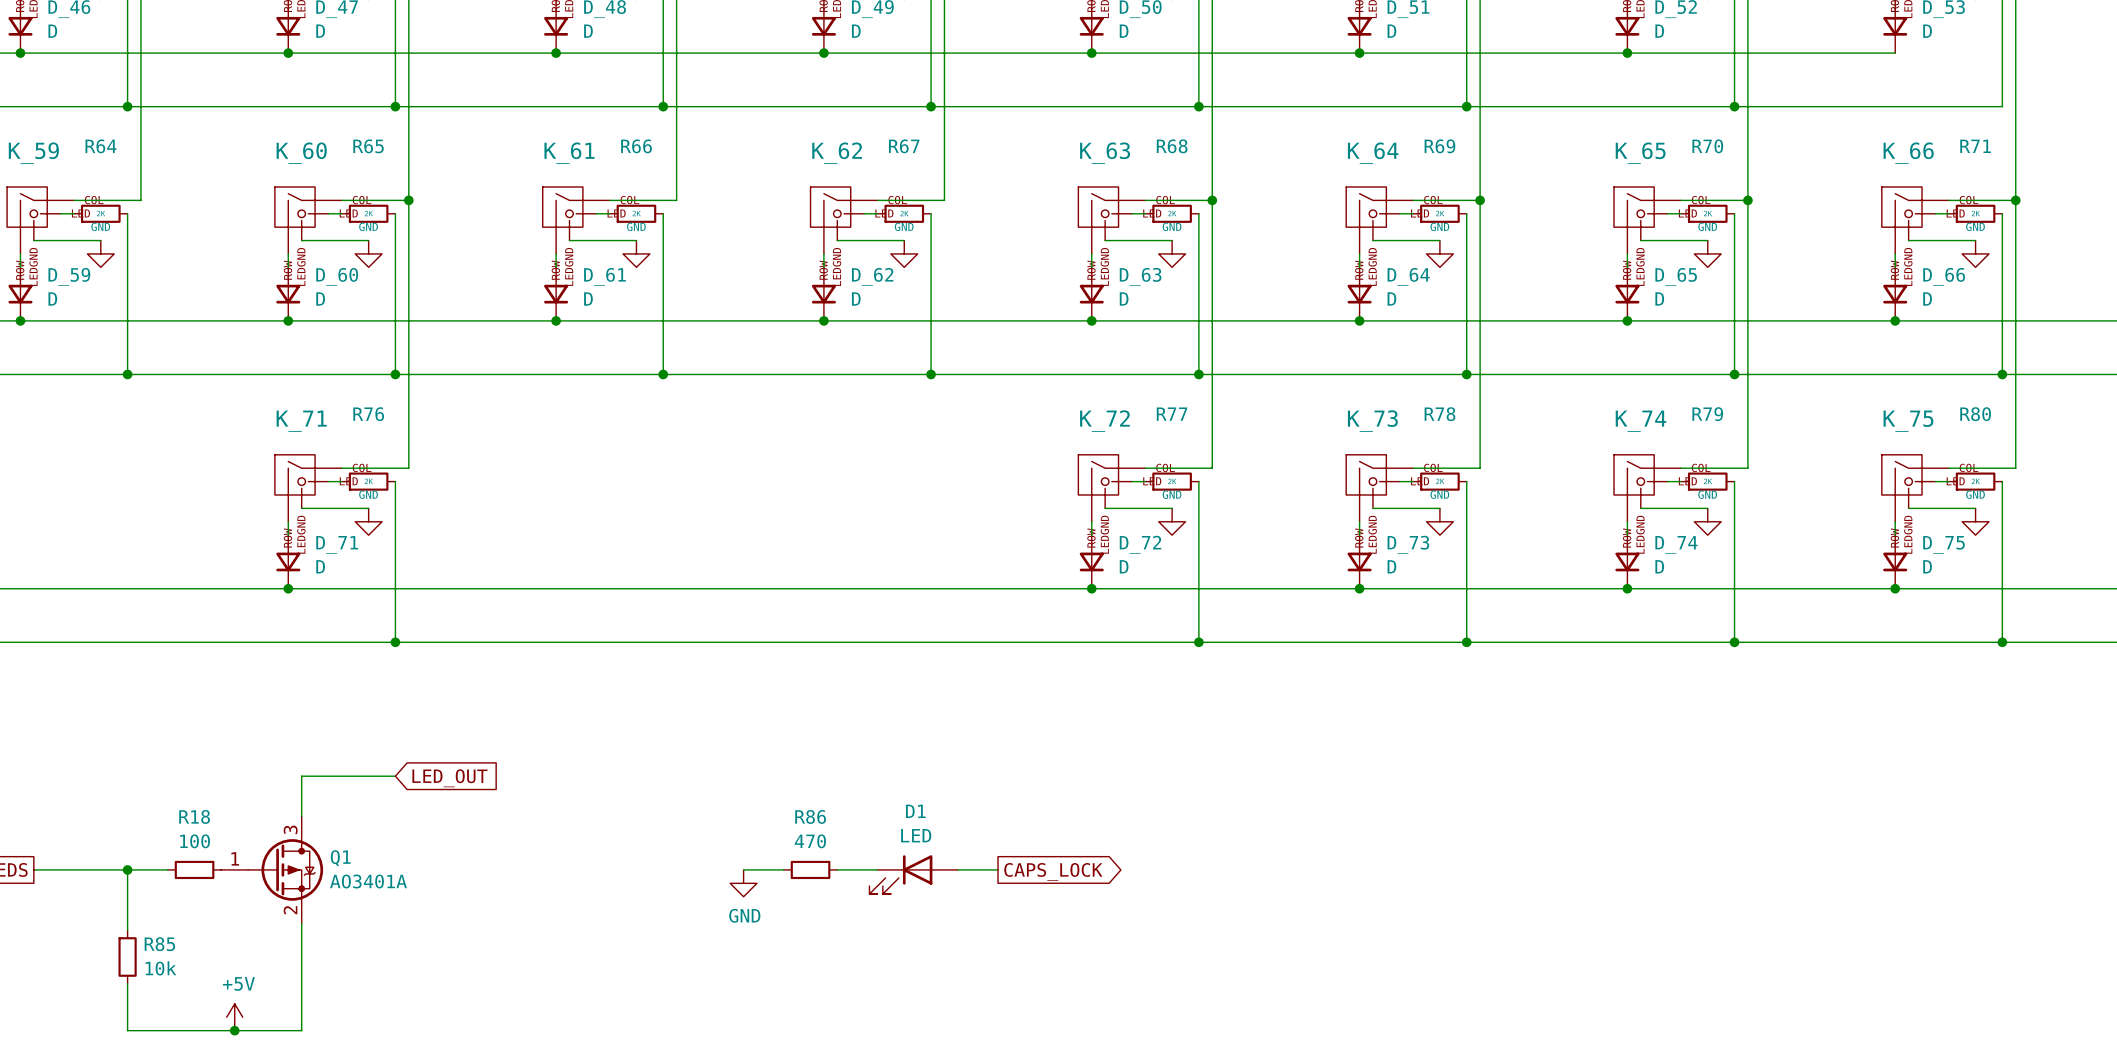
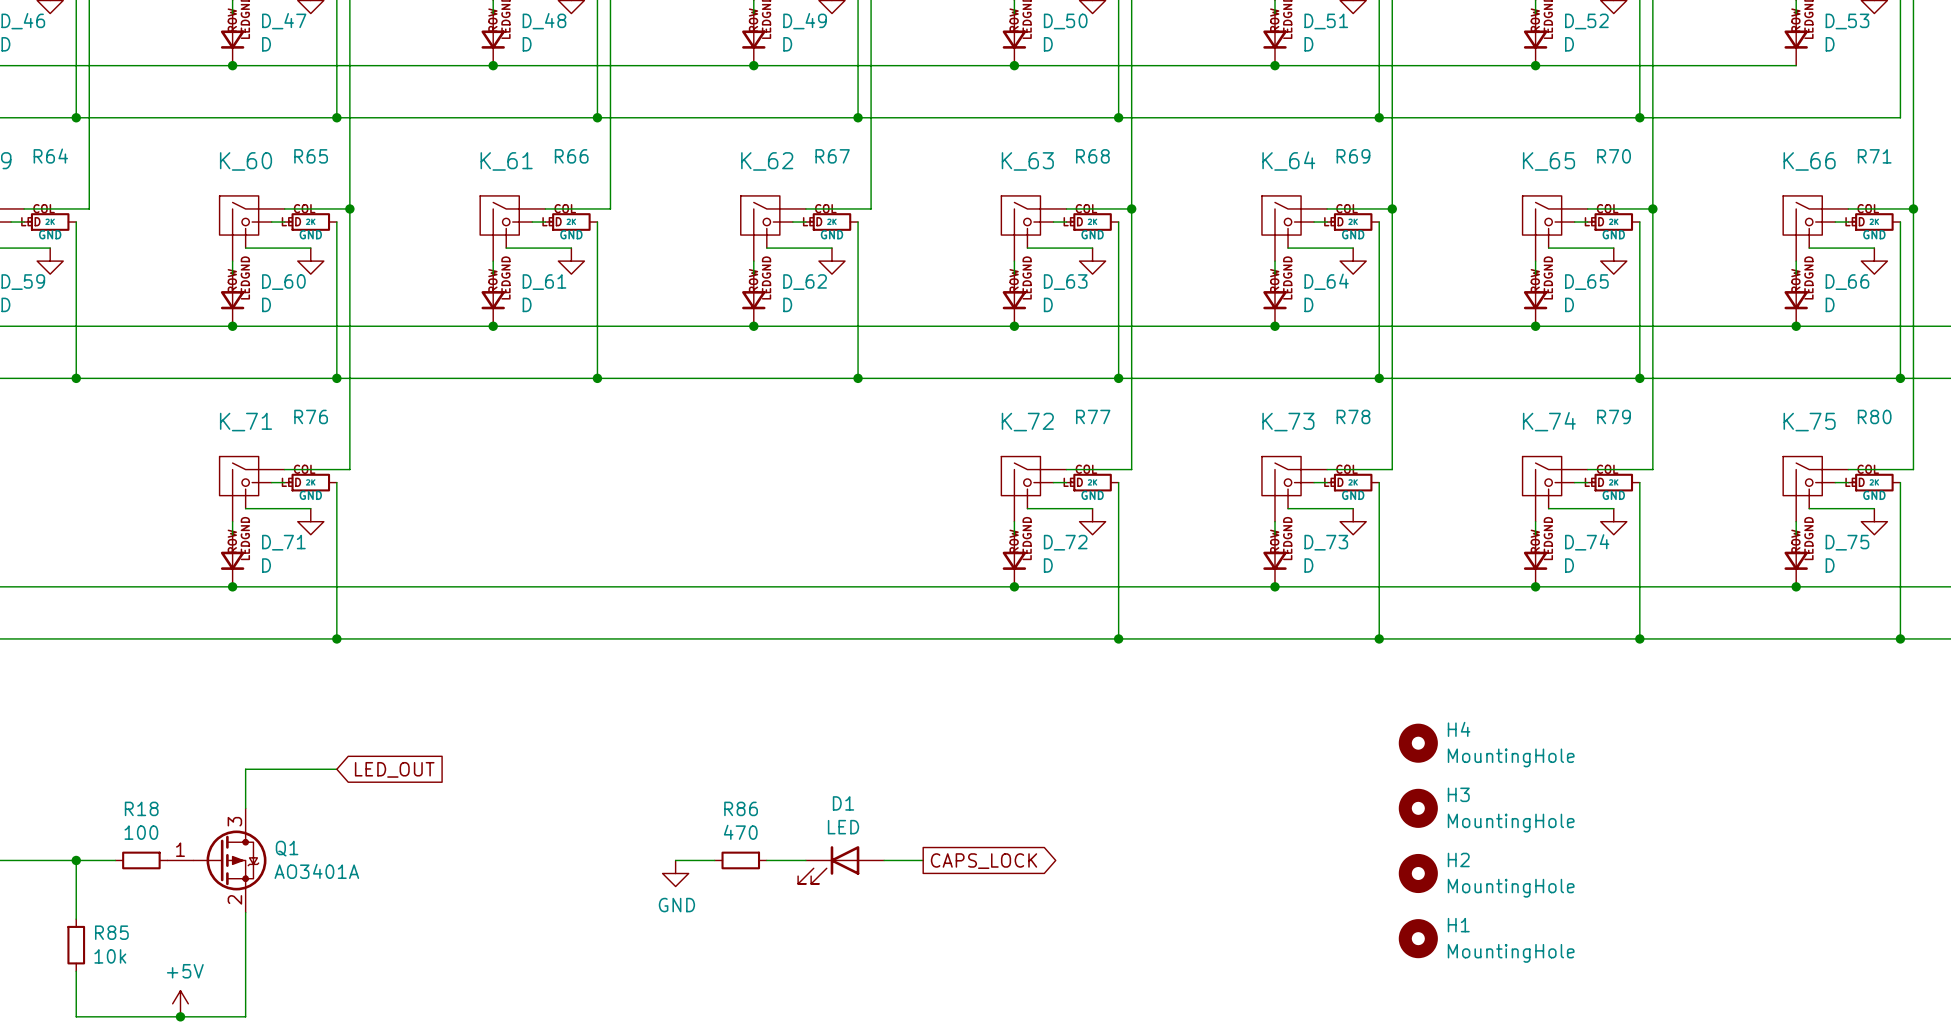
H4: none -> MountingHole (1418, 743)
H3: none -> MountingHole (1418, 808)
H2: none -> MountingHole (1418, 873)
H1: none -> MountingHole (1418, 938)

